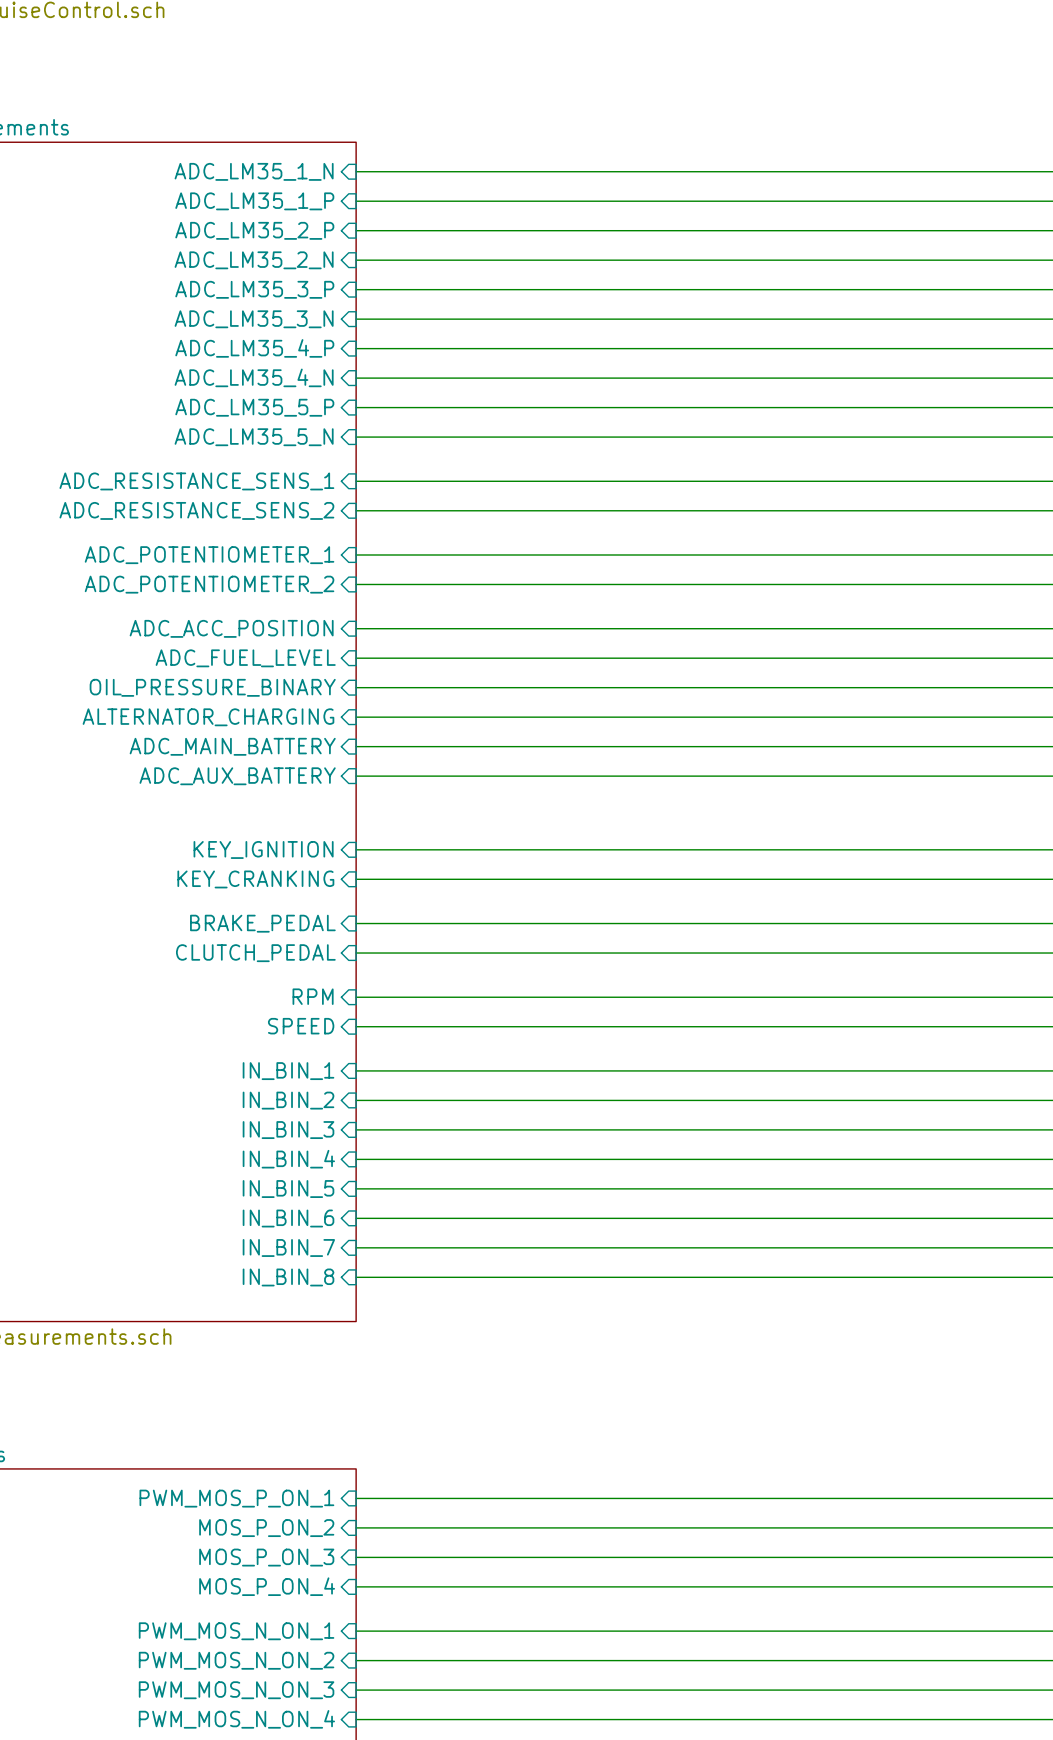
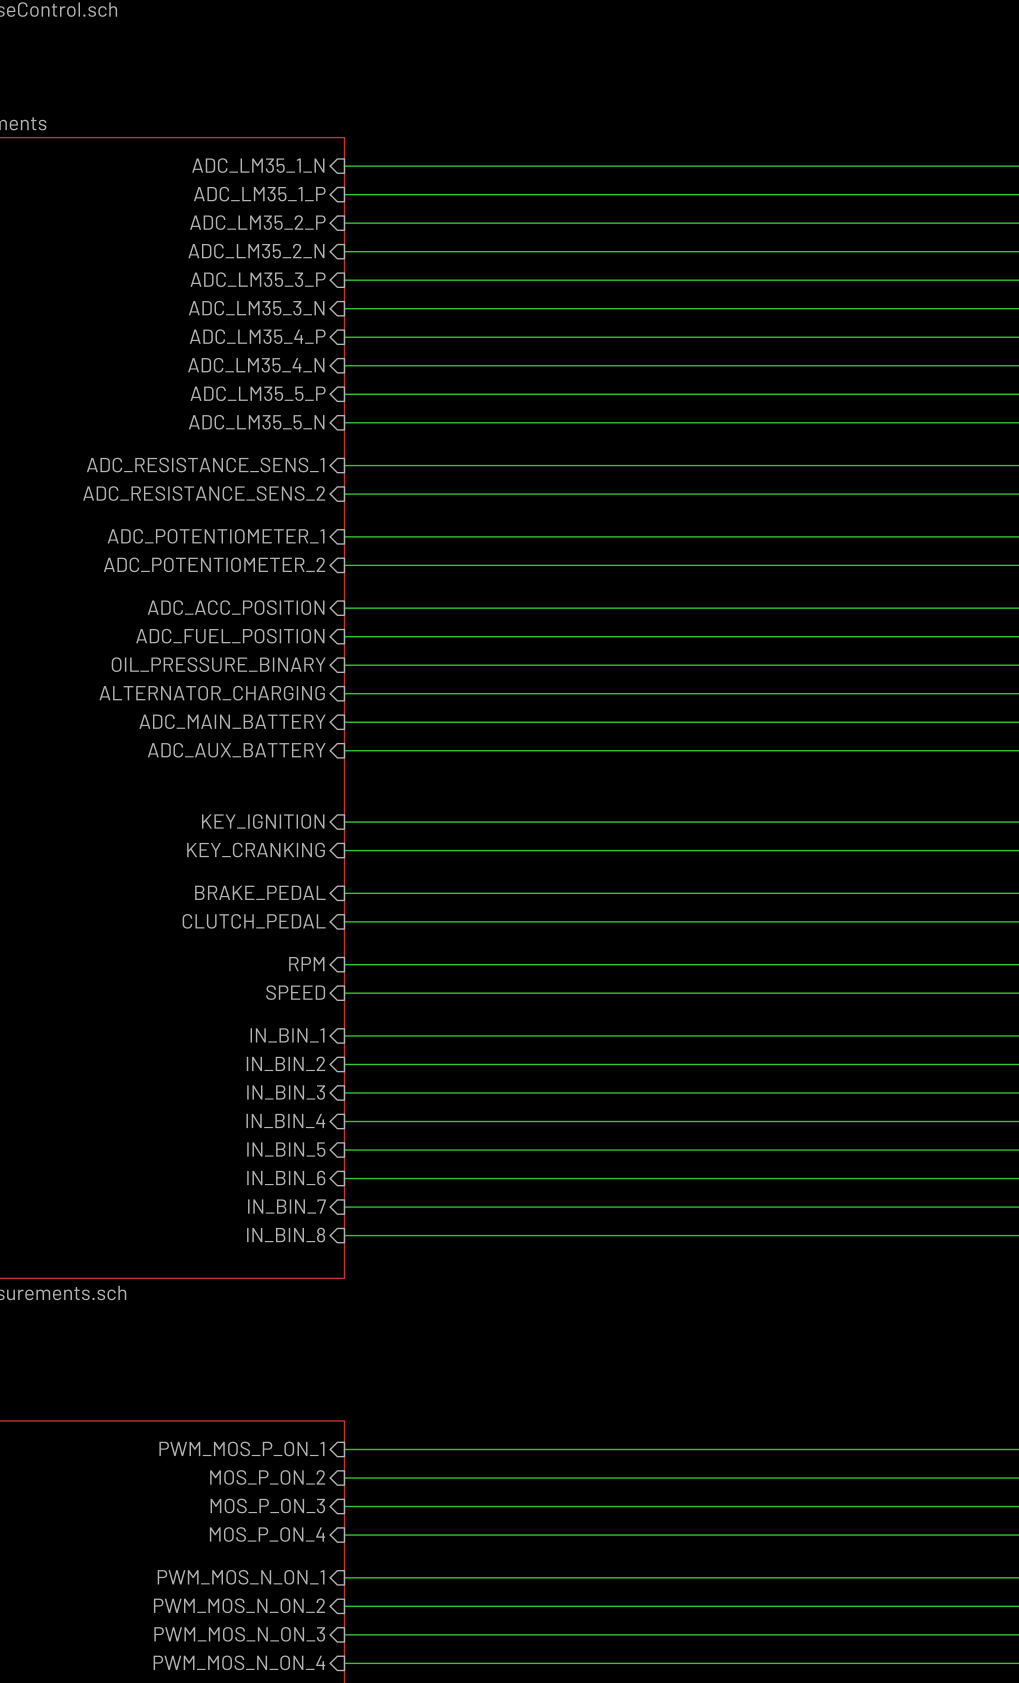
sheet pin: ADC_FUEL_LEVEL (245, 658) -> ADC_FUEL_POSITION (230, 636)

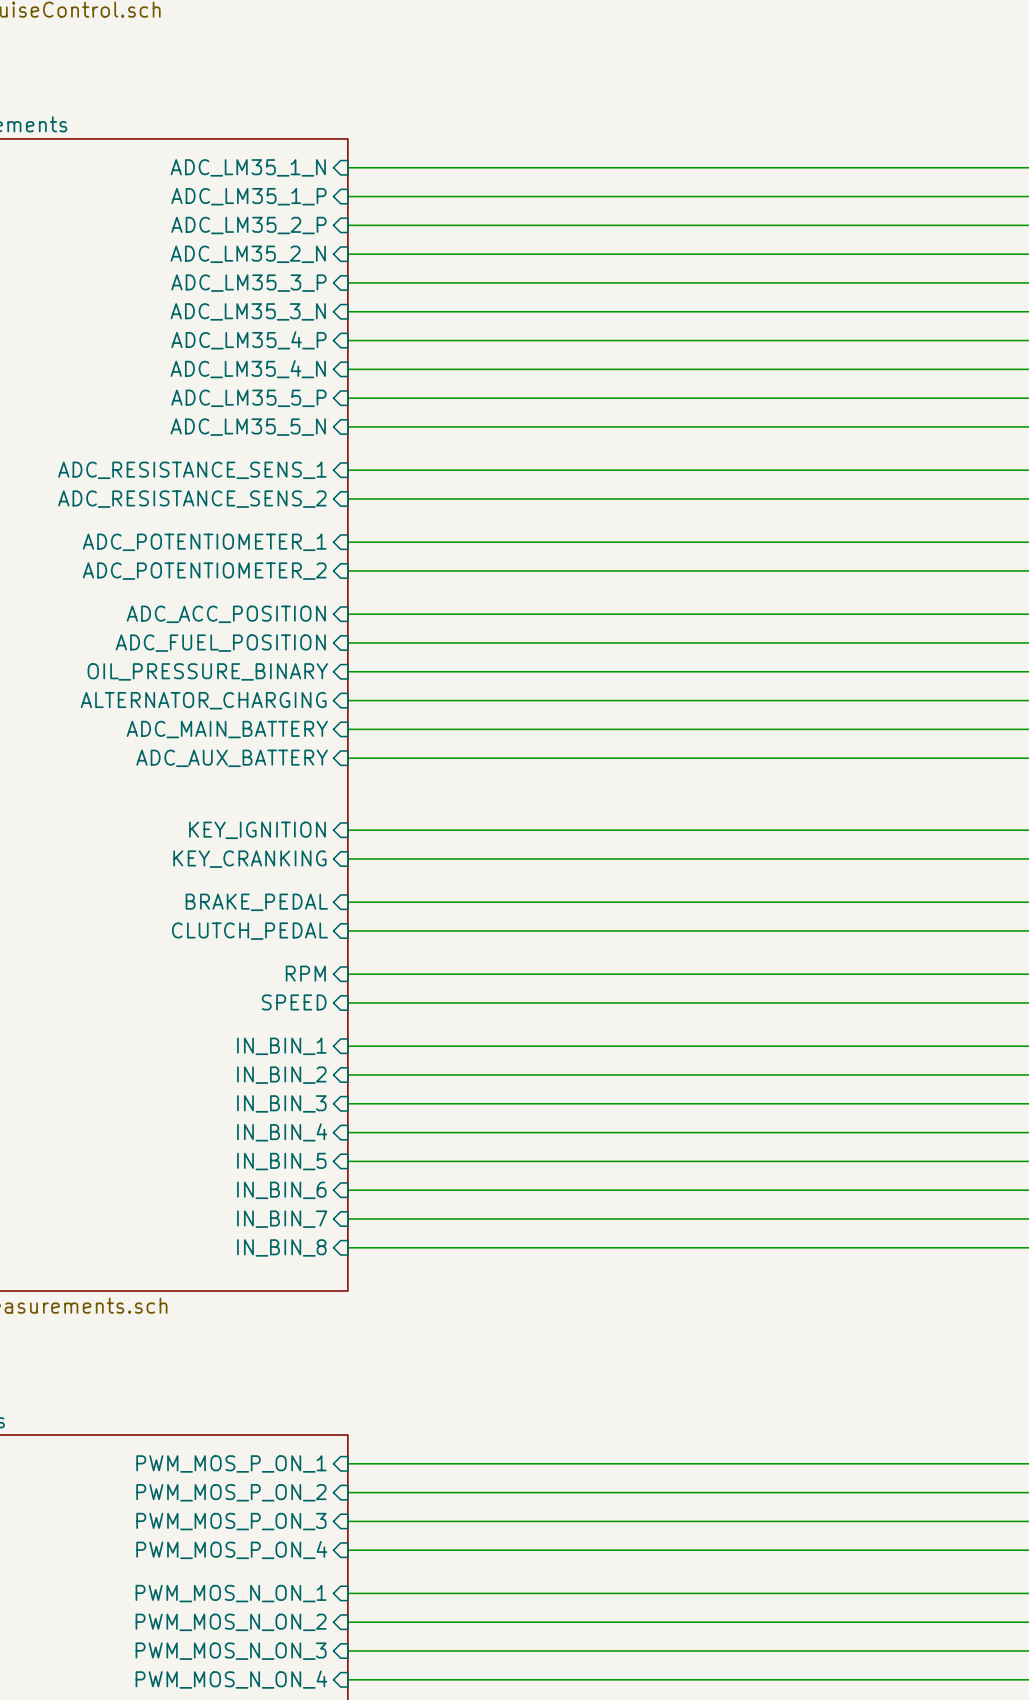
sheet pin: MOS_P_ON_2 (267, 1477) -> PWM_MOS_P_ON_2 (231, 1492)
sheet pin: MOS_P_ON_3 (267, 1505) -> PWM_MOS_P_ON_3 (231, 1521)
sheet pin: MOS_P_ON_4 (267, 1534) -> PWM_MOS_P_ON_4 (231, 1550)

